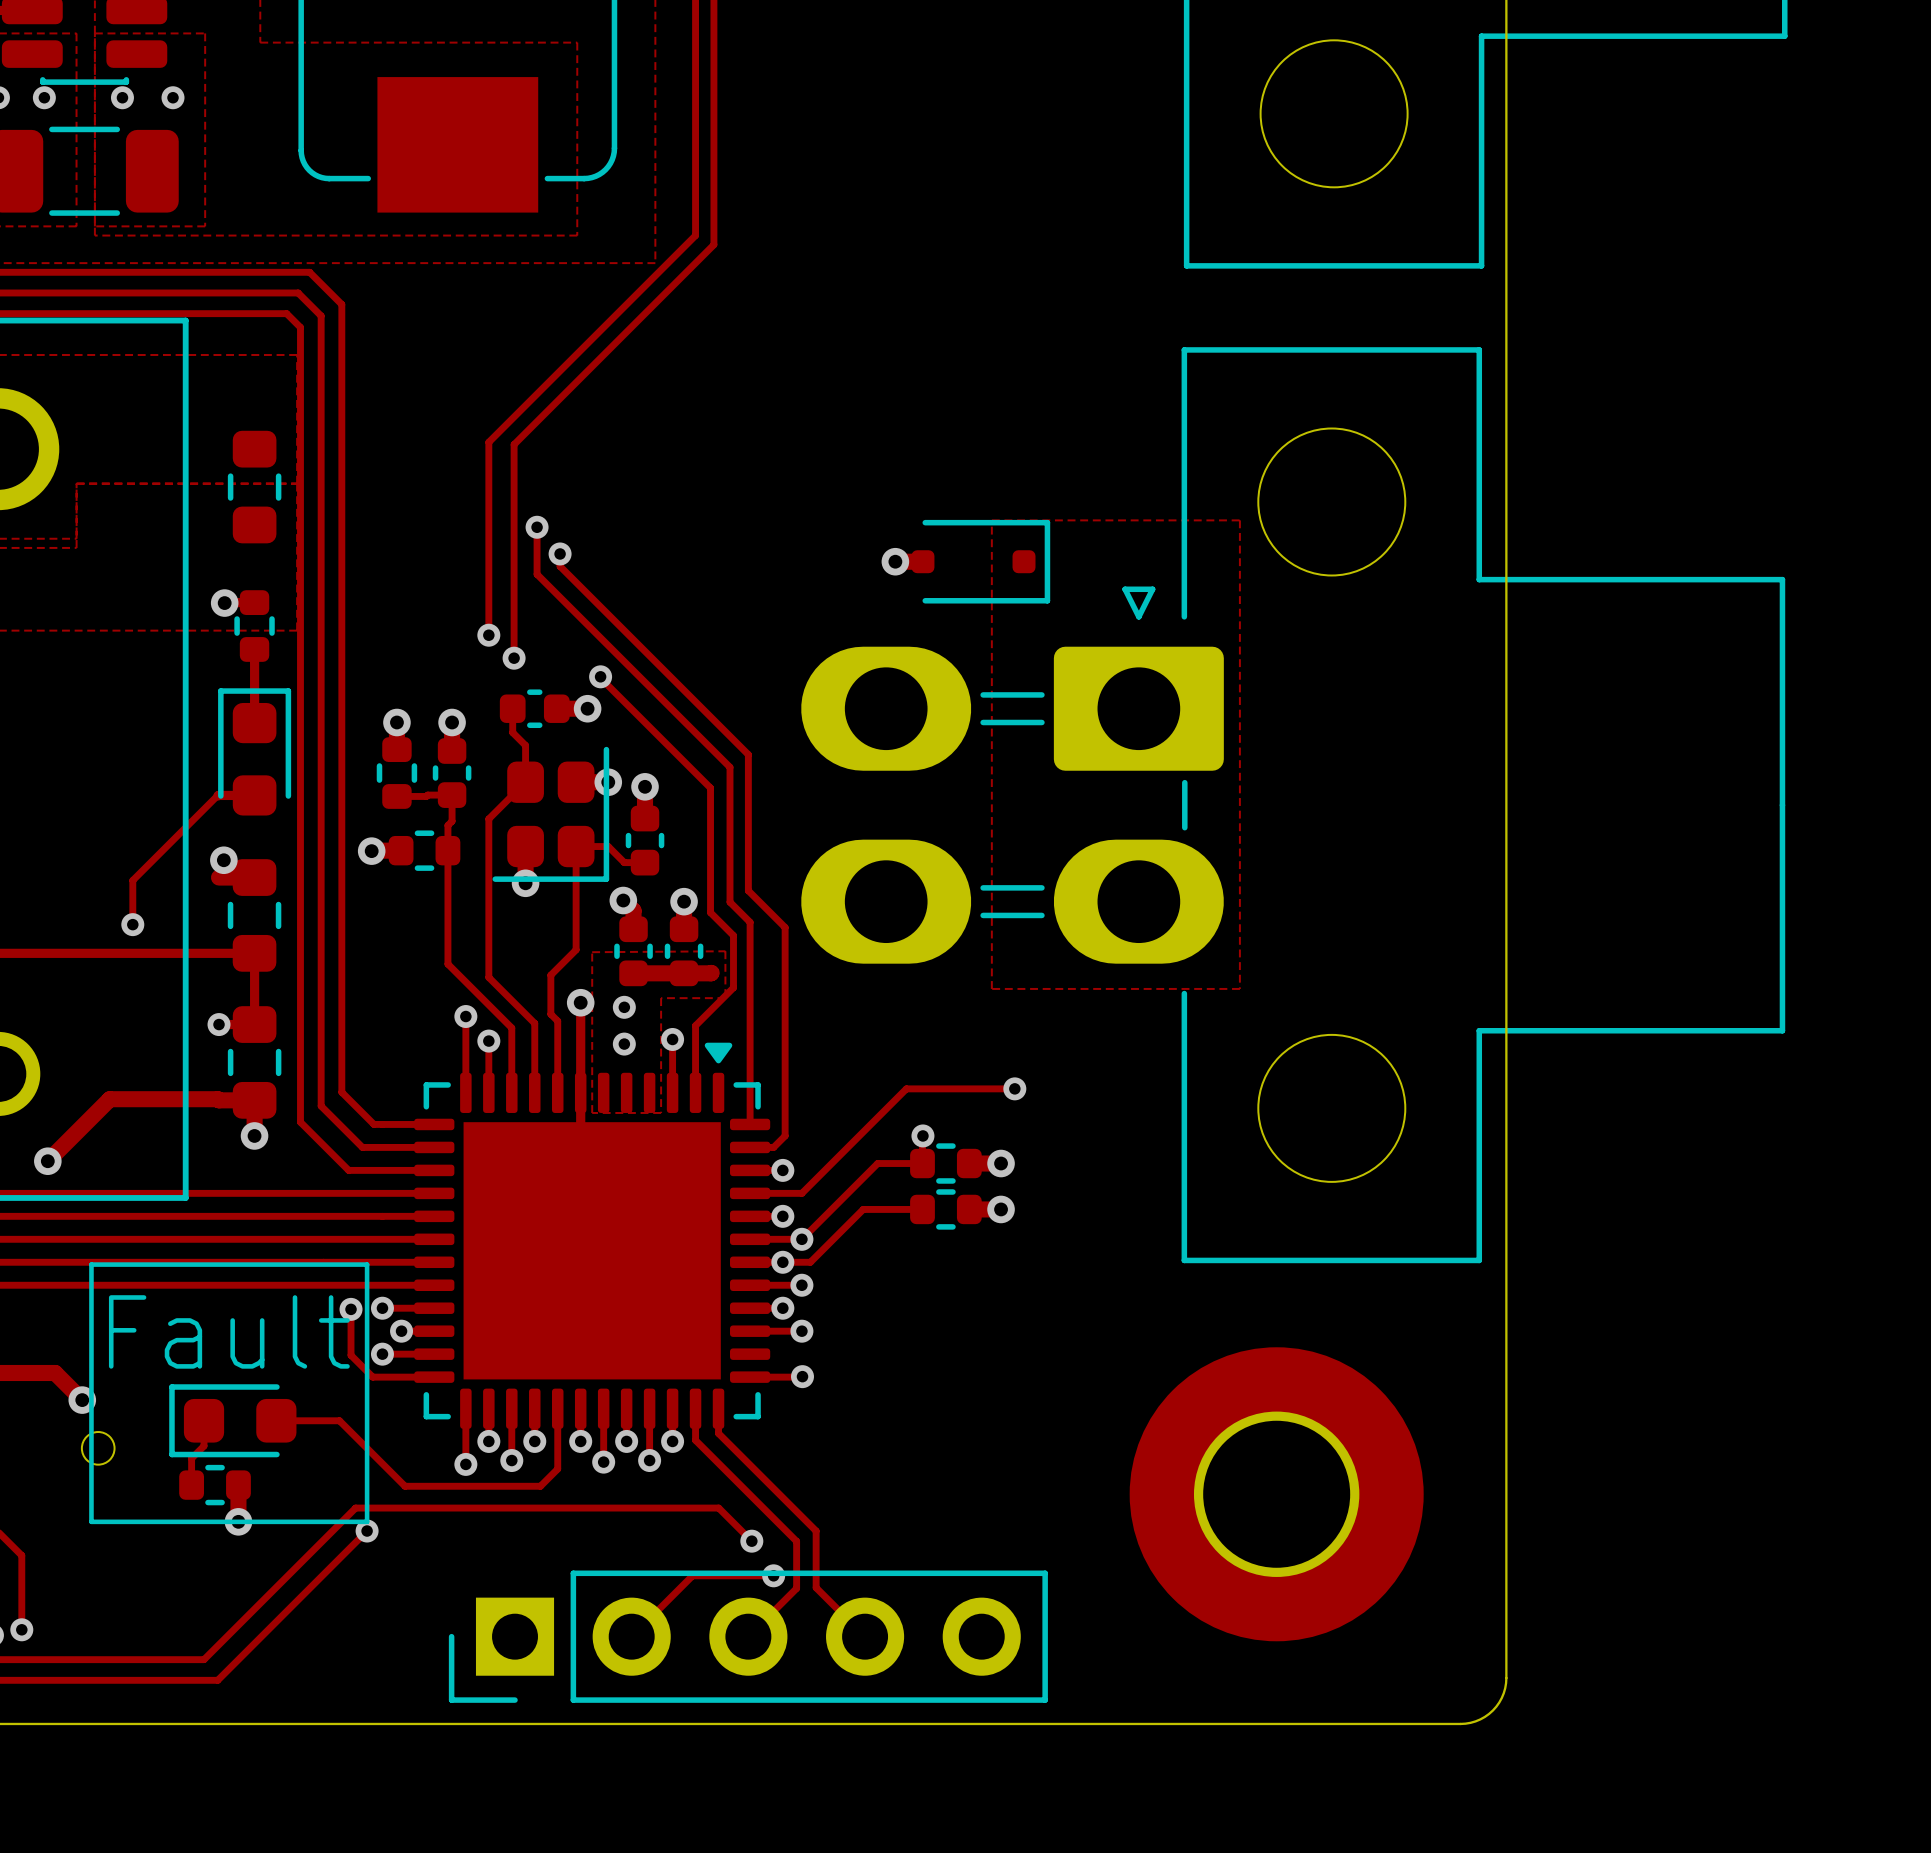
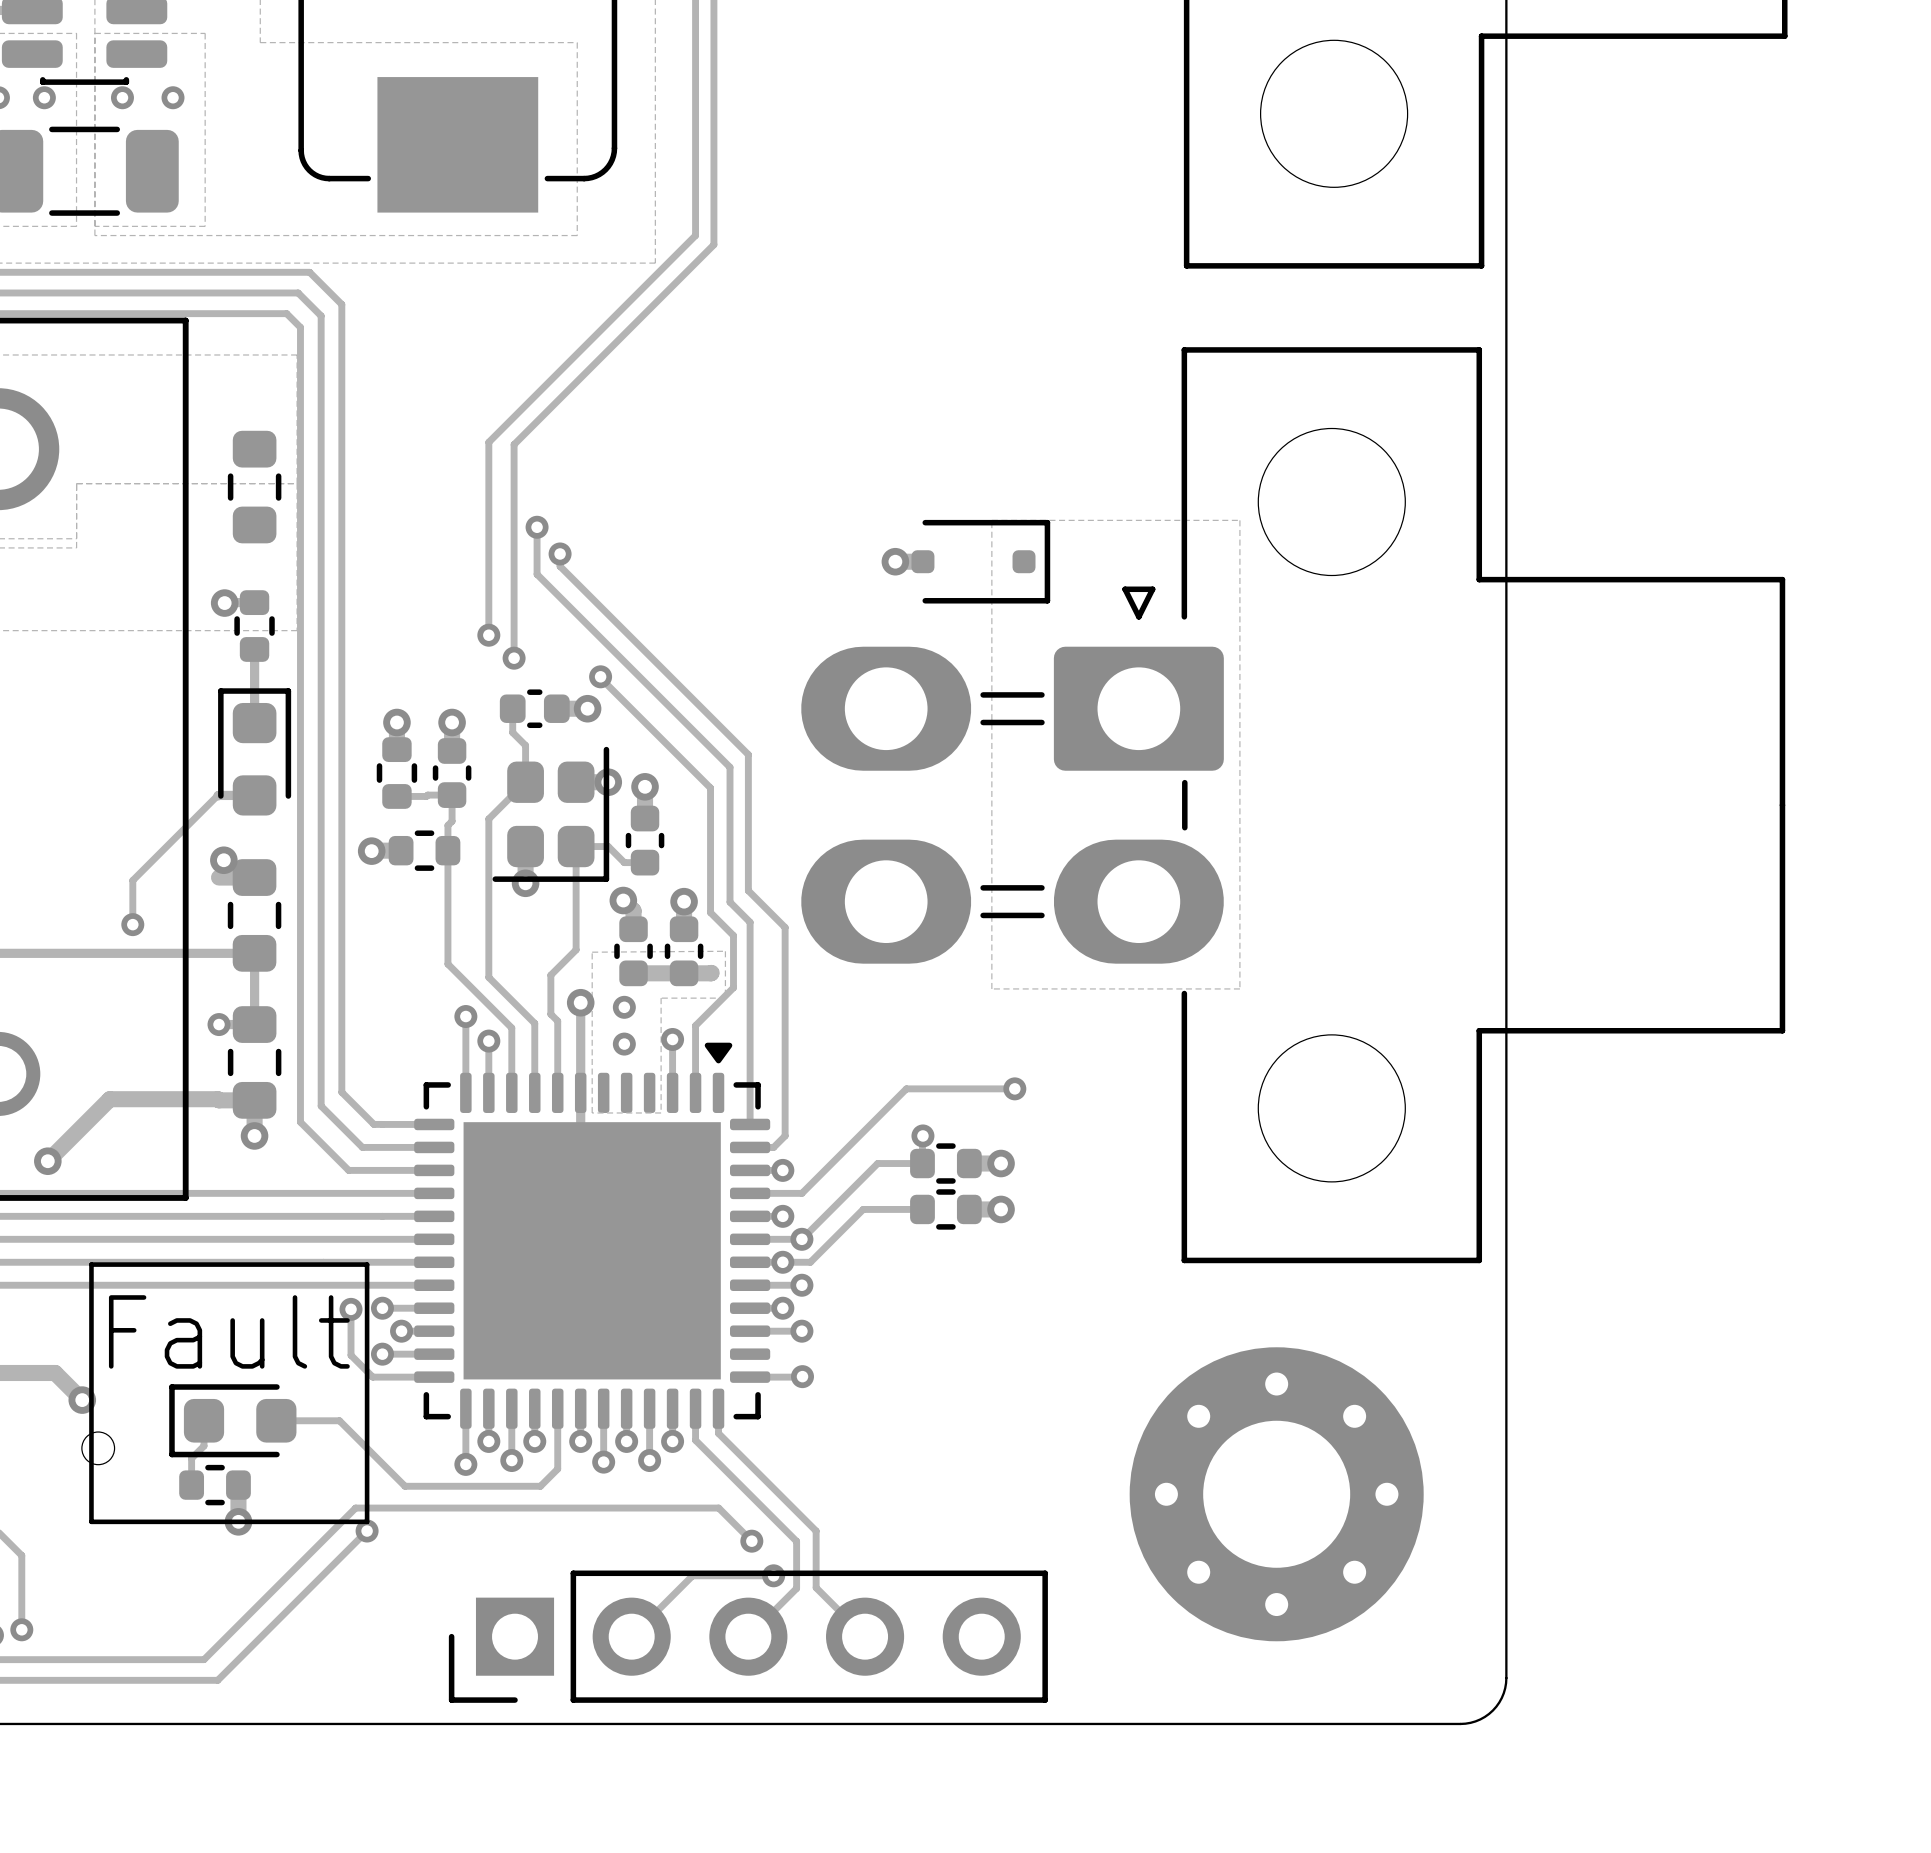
part footprint: [1129, 1347, 1424, 1642] -> [1129, 1347, 1424, 1642]

